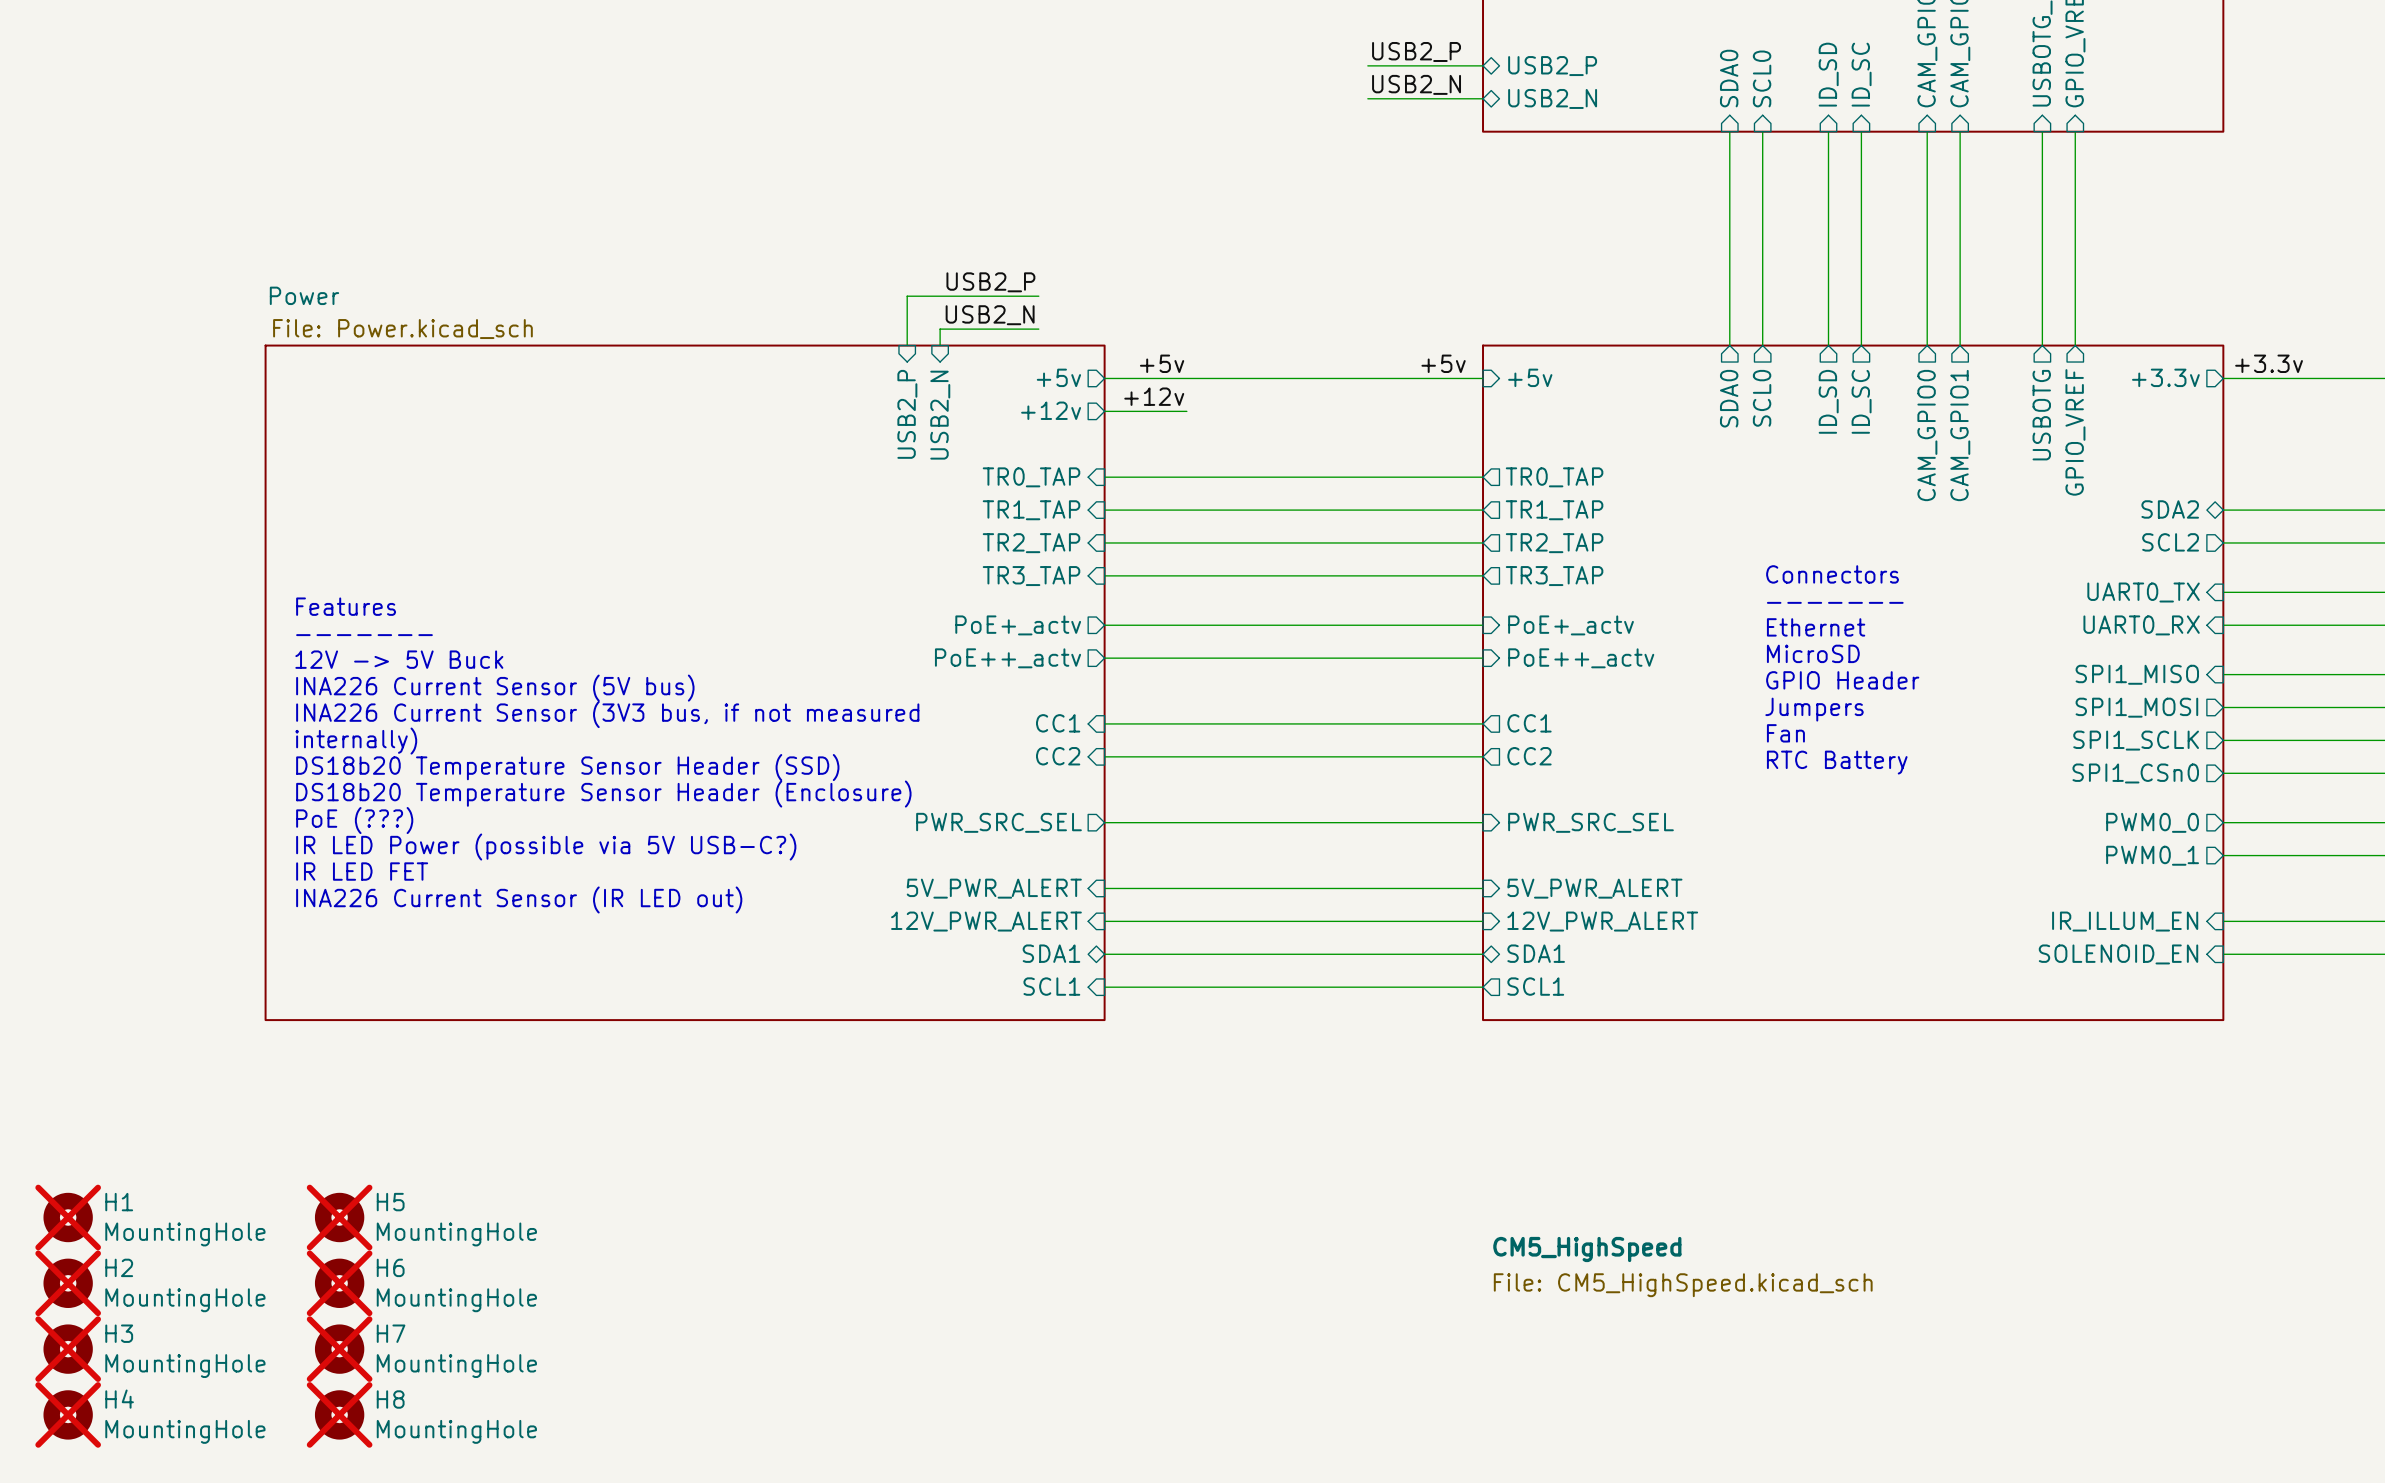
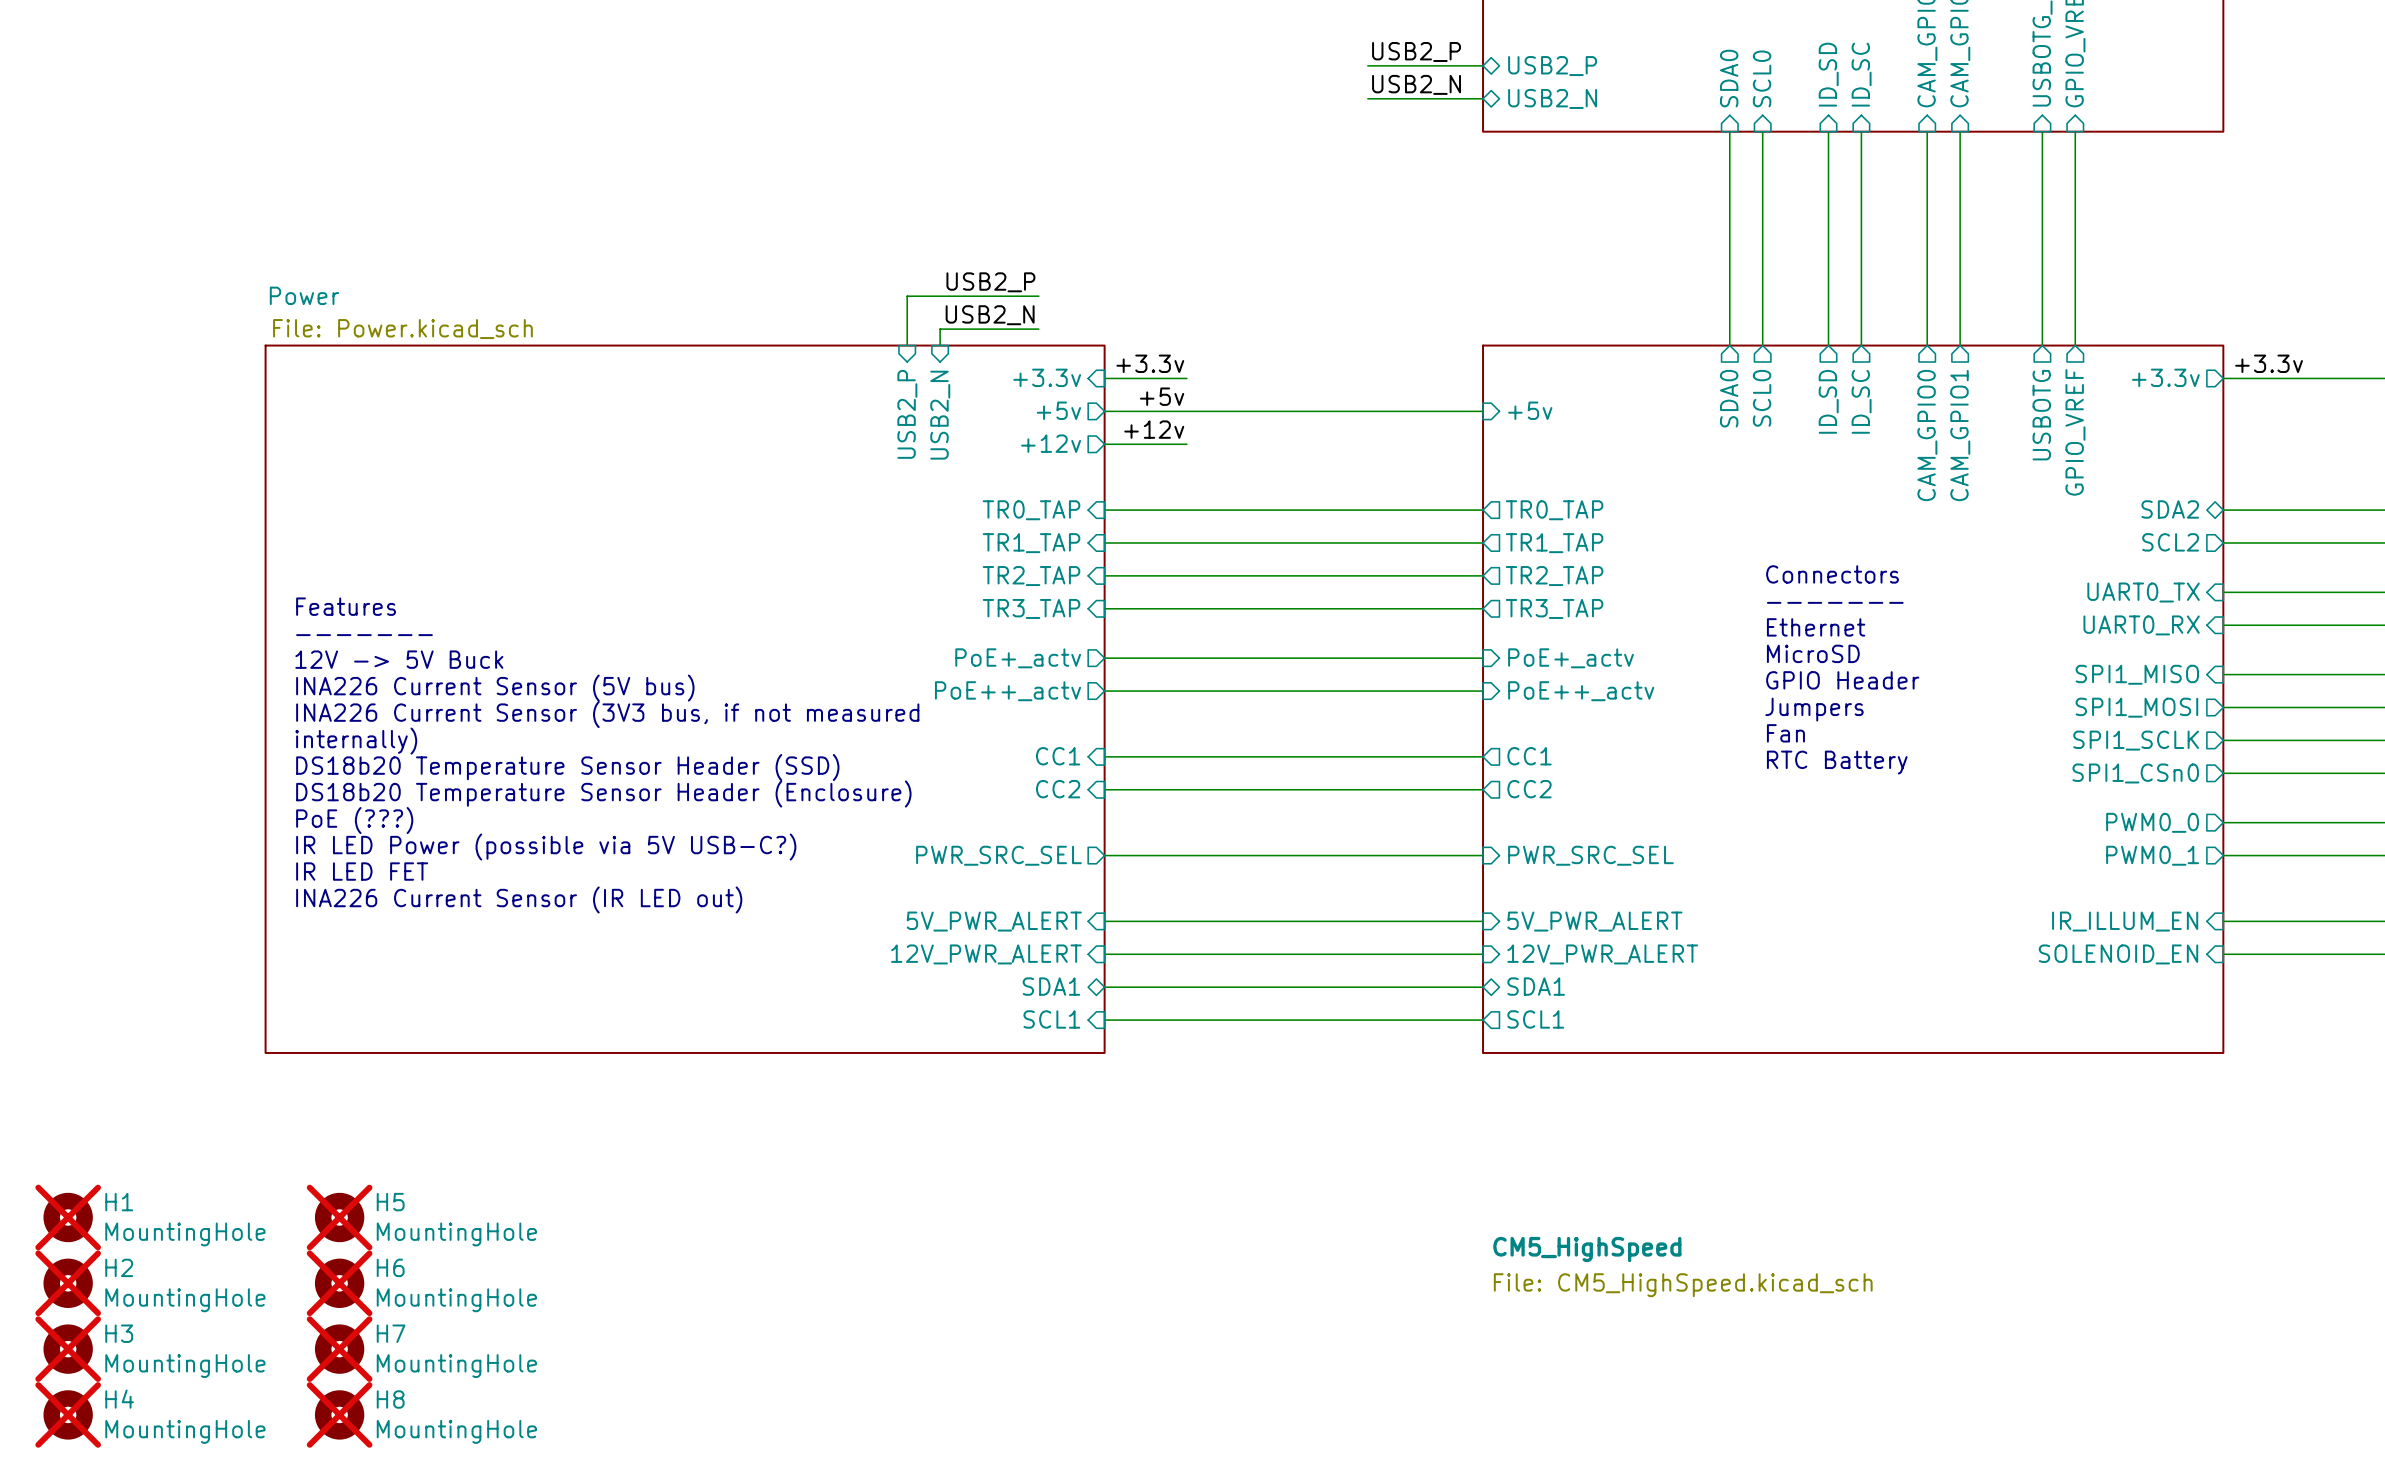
sheet CM5_HighSpeed shape: [1482, 344, 2225, 1022] -> [1482, 344, 2225, 1054]
label: +5v (1162, 363) -> +3.3v (1150, 363)
label: +5v (1443, 363) -> none
sheet pin shape: output (1058, 377) -> input (1047, 377)
sheet pin: +5v (1058, 377) -> +3.3v (1047, 377)
sheet pin position: +5v (1530, 377) -> +5v (1530, 410)
wire: (1186, 378) (1483, 378) -> (1186, 411) (1483, 411)
label: +12v (1154, 396) -> +5v (1162, 396)
sheet pin: +12v (1051, 410) -> +5v (1058, 410)
label: none -> +12v (1154, 429)
sheet pin: none -> +12v (1051, 443)
wire: none -> (1104, 444) (1186, 444)
sheet pin: TR0_TAP (1031, 477) -> none
wire: (1104, 477) (1483, 477) -> (1104, 608) (1483, 608)
sheet pin: TR0_TAP (1554, 477) -> none
sheet pin: TR1_TAP (1031, 510) -> TR0_TAP (1031, 510)
sheet pin: TR1_TAP (1554, 510) -> TR0_TAP (1554, 510)
sheet pin: TR2_TAP (1031, 543) -> TR1_TAP (1031, 543)
sheet pin: TR2_TAP (1554, 543) -> TR1_TAP (1554, 543)
sheet pin: TR3_TAP (1031, 576) -> TR2_TAP (1031, 576)
sheet pin: TR3_TAP (1554, 576) -> TR2_TAP (1554, 576)
sheet pin: none -> TR3_TAP (1031, 608)
sheet pin: none -> TR3_TAP (1554, 608)
sheet pin: PoE+_actv (1018, 625) -> none
wire: (1104, 625) (1483, 625) -> none
sheet pin: PoE+_actv (1571, 625) -> none
sheet pin: PoE++_actv (1008, 658) -> PoE+_actv (1018, 658)
sheet pin: PoE++_actv (1581, 658) -> PoE+_actv (1571, 658)
sheet Power: File: Power.kicad_sch (685, 682) -> none
sheet pin: none -> PoE++_actv (1008, 691)
sheet pin: none -> PoE++_actv (1581, 691)
sheet Power: none -> File: Power.kicad_sch (685, 699)
sheet pin: CC1 (1058, 723) -> none
wire: (1104, 723) (1483, 723) -> (1104, 691) (1483, 691)
sheet pin: CC1 (1529, 723) -> none
sheet pin: CC2 (1058, 756) -> CC1 (1058, 756)
sheet pin: CC2 (1529, 756) -> CC1 (1529, 756)
sheet pin: none -> CC2 (1058, 789)
sheet pin: none -> CC2 (1529, 789)
sheet pin position: PWR_SRC_SEL (998, 822) -> PWR_SRC_SEL (998, 855)
wire: (1104, 822) (1483, 822) -> (1104, 789) (1483, 789)
sheet pin position: PWR_SRC_SEL (1590, 822) -> PWR_SRC_SEL (1590, 855)
sheet pin: 5V_PWR_ALERT (994, 888) -> none
wire: (1104, 888) (1483, 888) -> (1104, 855) (1483, 855)
sheet pin: 5V_PWR_ALERT (1594, 888) -> none
sheet pin: 12V_PWR_ALERT (986, 921) -> 5V_PWR_ALERT (994, 921)
sheet pin: 12V_PWR_ALERT (1602, 921) -> 5V_PWR_ALERT (1594, 921)
sheet pin shape: bidirectional (1051, 953) -> input (986, 954)
sheet pin: SDA1 (1051, 953) -> 12V_PWR_ALERT (986, 954)
sheet pin shape: bidirectional (1536, 953) -> input (1602, 954)
sheet pin: SDA1 (1536, 953) -> 12V_PWR_ALERT (1602, 954)
sheet pin shape: input (1051, 986) -> bidirectional (1051, 986)
sheet pin: SCL1 (1051, 986) -> SDA1 (1051, 986)
sheet pin shape: output (1535, 986) -> bidirectional (1536, 986)
sheet pin: SCL1 (1535, 986) -> SDA1 (1536, 986)
sheet pin: none -> SCL1 (1051, 1019)
sheet pin: none -> SCL1 (1535, 1019)
wire: none -> (1104, 1020) (1483, 1020)

